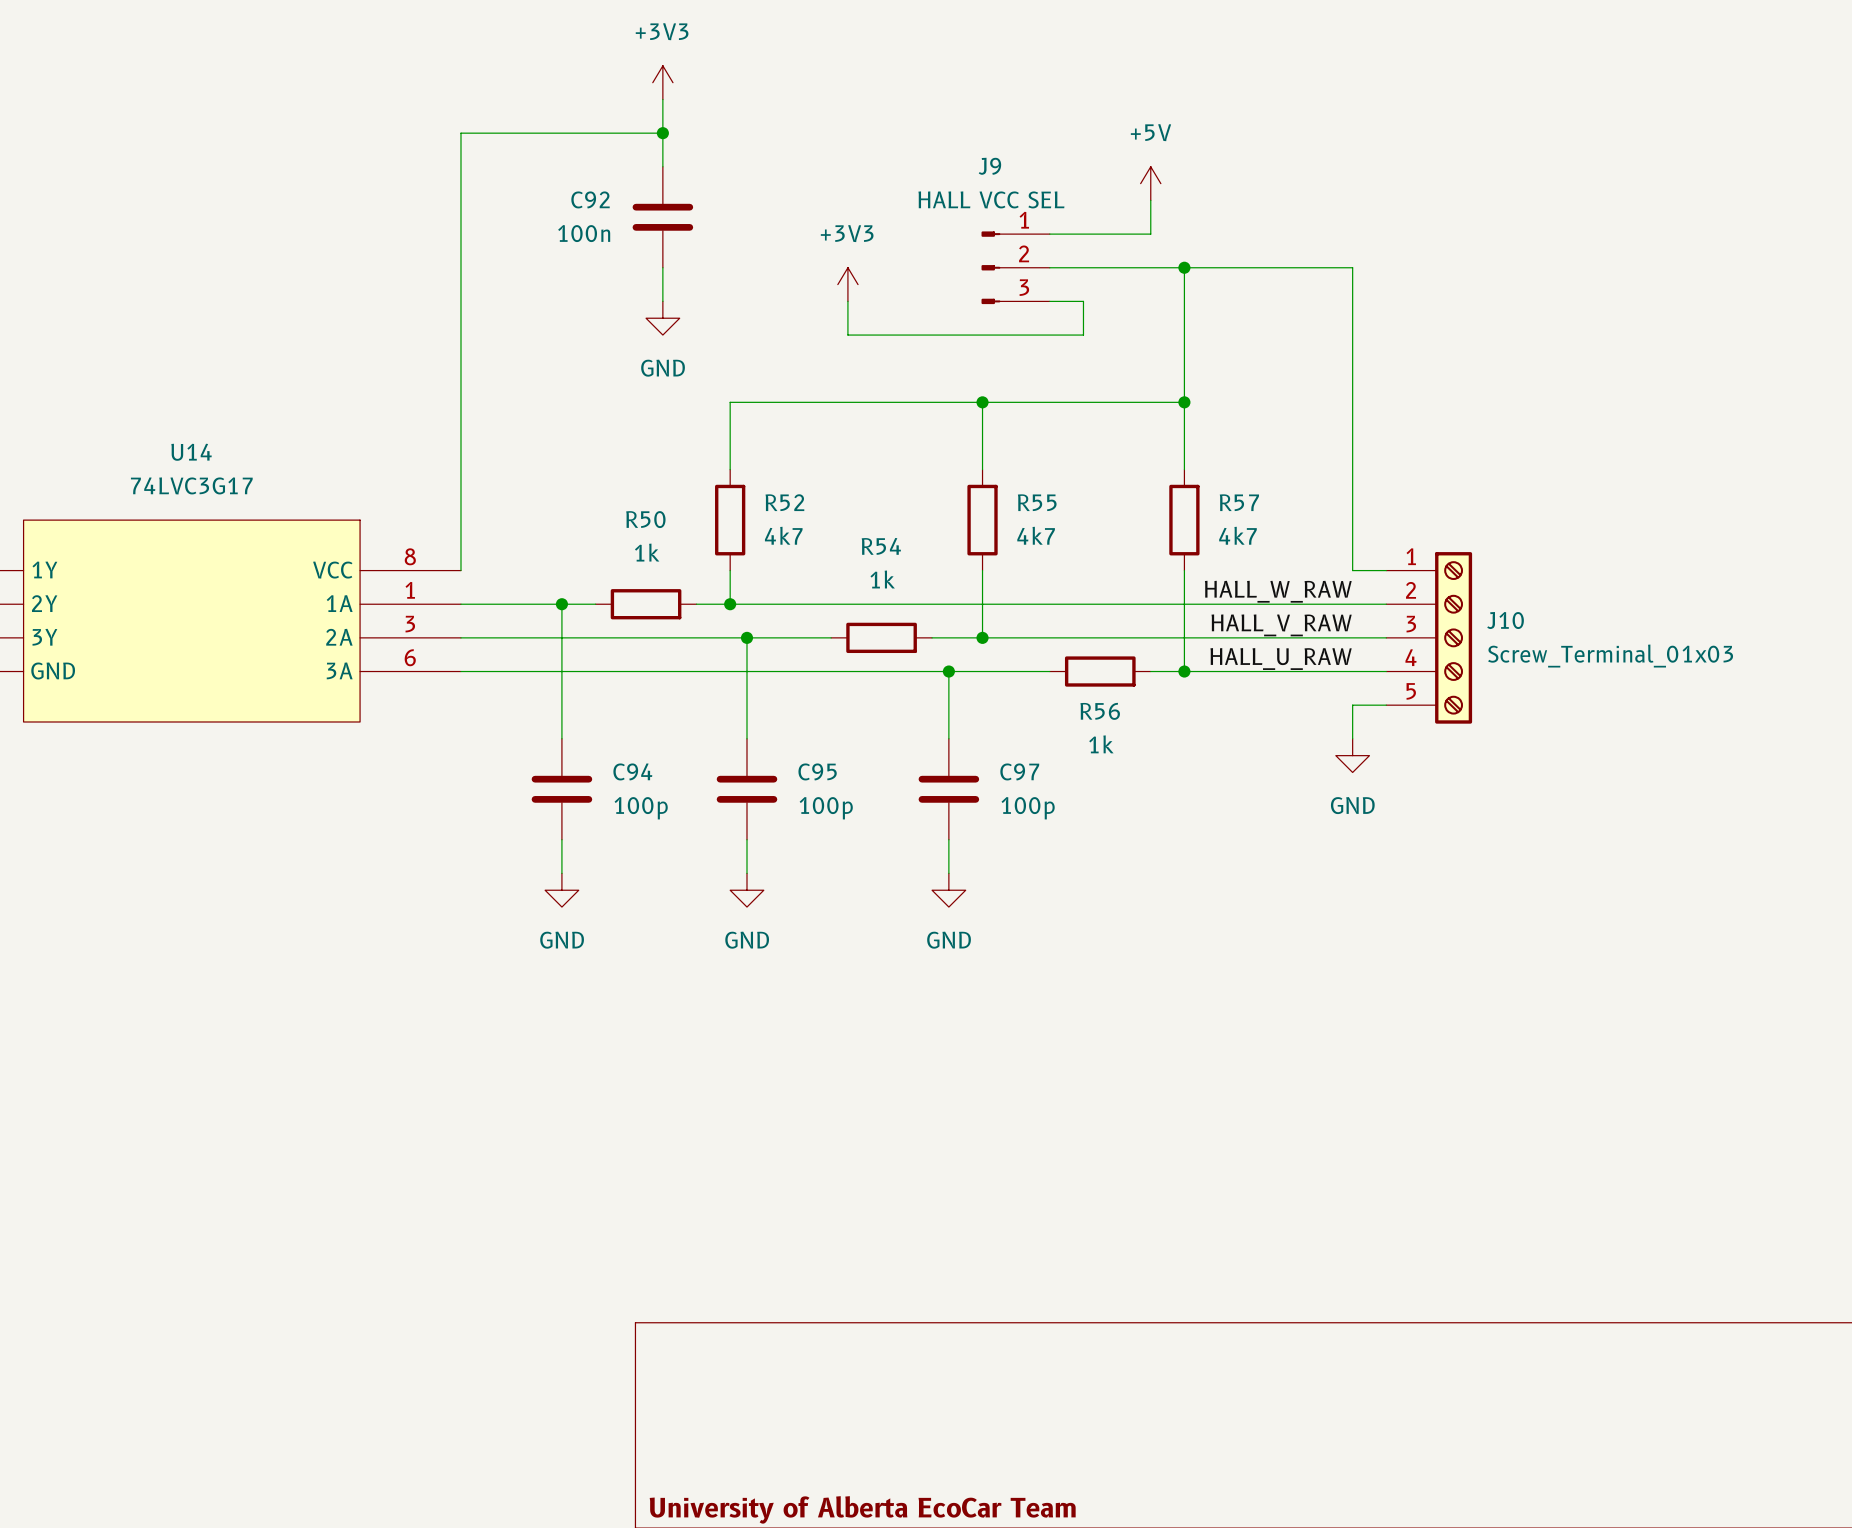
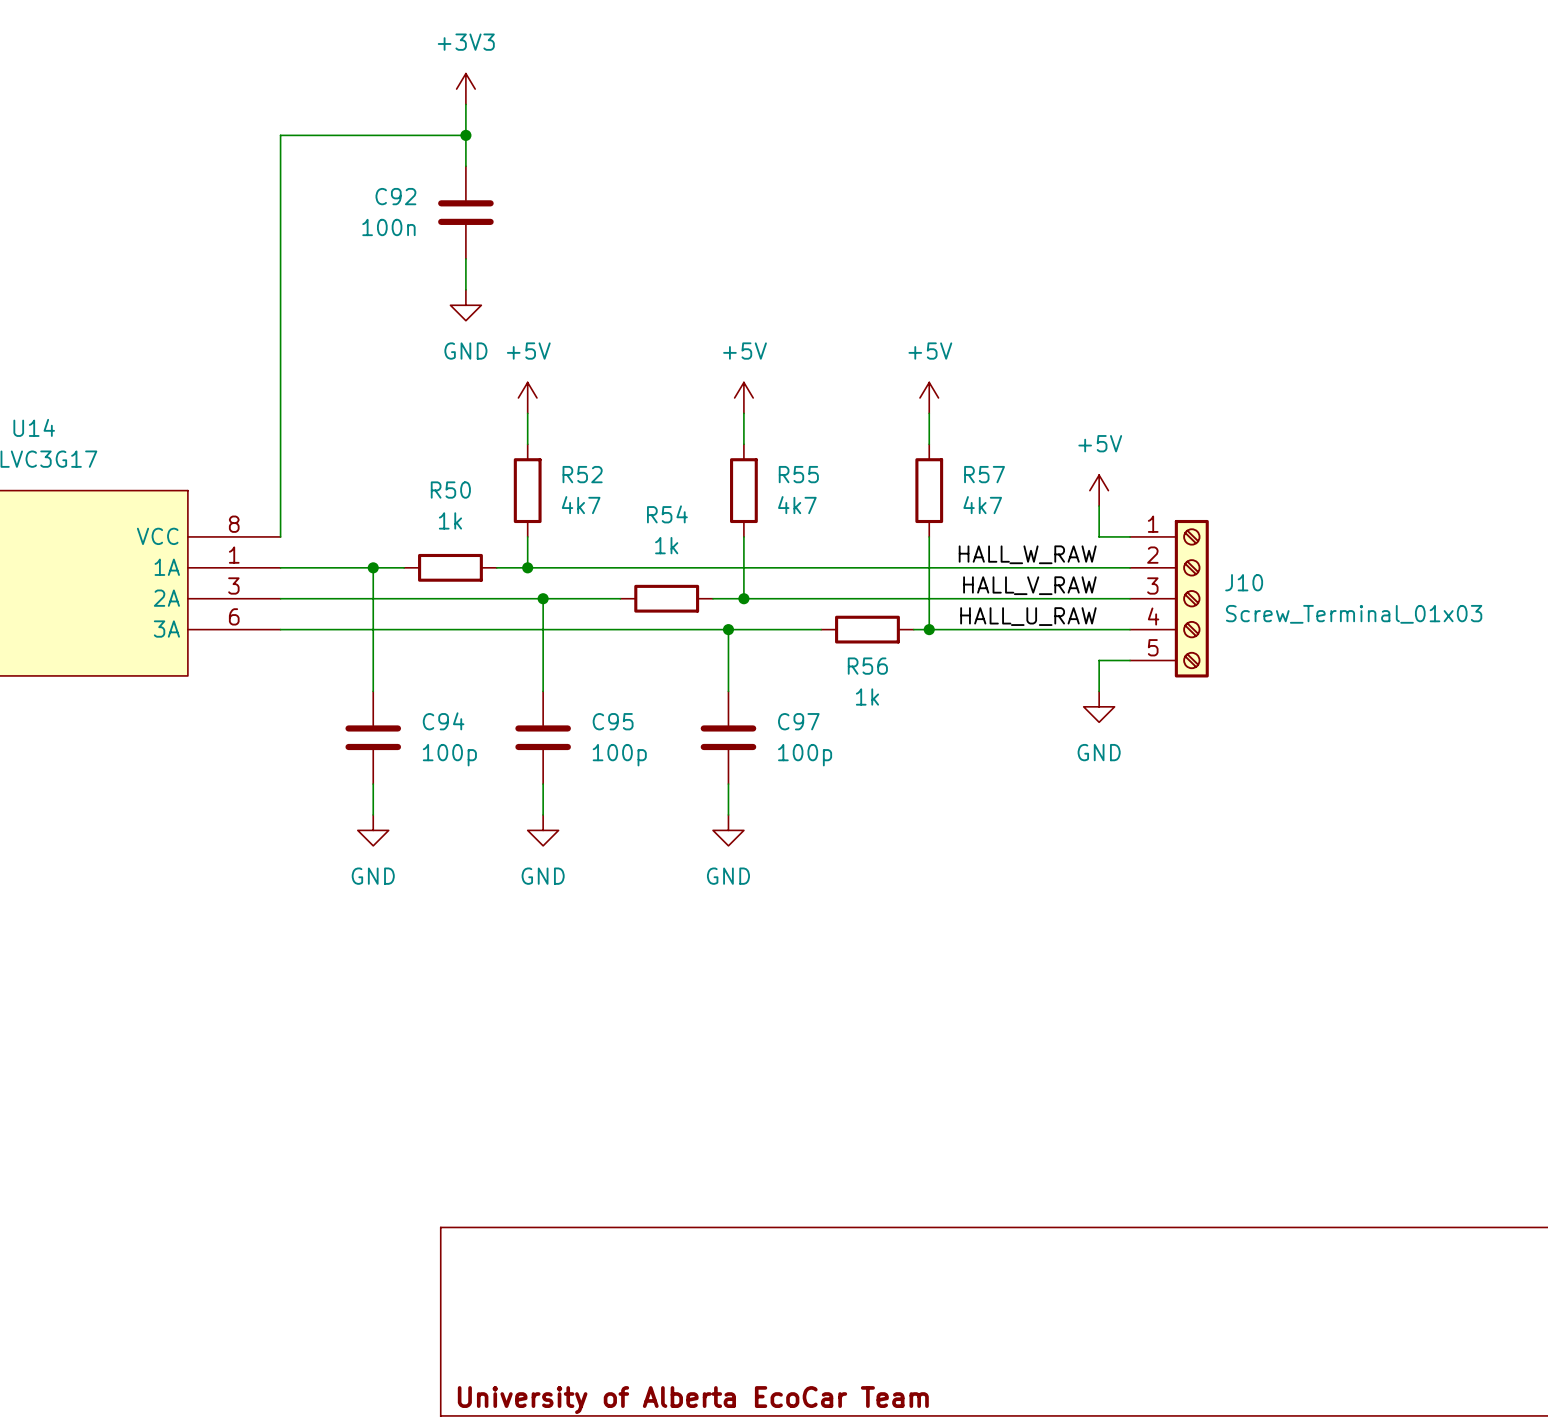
power symbol: +5V (1150, 183) -> none
wire: (1150, 200) (1150, 234) (1049, 234) -> none
J9: HALL VCC SEL (1015, 267) -> none
wire: (1049, 267) (1352, 267) (1352, 536) -> none
wire: (1184, 267) (1184, 469) -> none
junction: (1184, 267) -> none
power symbol: +3V3 (847, 284) -> none
wire: (847, 301) (847, 335) (1083, 335) (1083, 301) (1049, 301) -> none
wire: (982, 402) (982, 469) -> none
junction: (982, 402) -> none
wire: (1184, 402) (730, 402) (730, 435) -> none
junction: (1184, 402) -> none
power symbol: none -> +5V (527, 397)
power symbol: none -> +5V (743, 397)
power symbol: none -> +5V (929, 397)
wire: none -> (743, 413) (743, 444)
wire: none -> (929, 413) (929, 444)
R55 position: (982, 520) -> (743, 490)
R57 position: (1184, 520) -> (929, 490)
power symbol: none -> +5V (1099, 490)
wire: (982, 570) (982, 637) -> (743, 536) (743, 598)
wire: (1184, 570) (1184, 671) -> (929, 536) (929, 629)
junction position: (982, 637) -> (743, 598)
junction position: (1184, 671) -> (929, 629)

